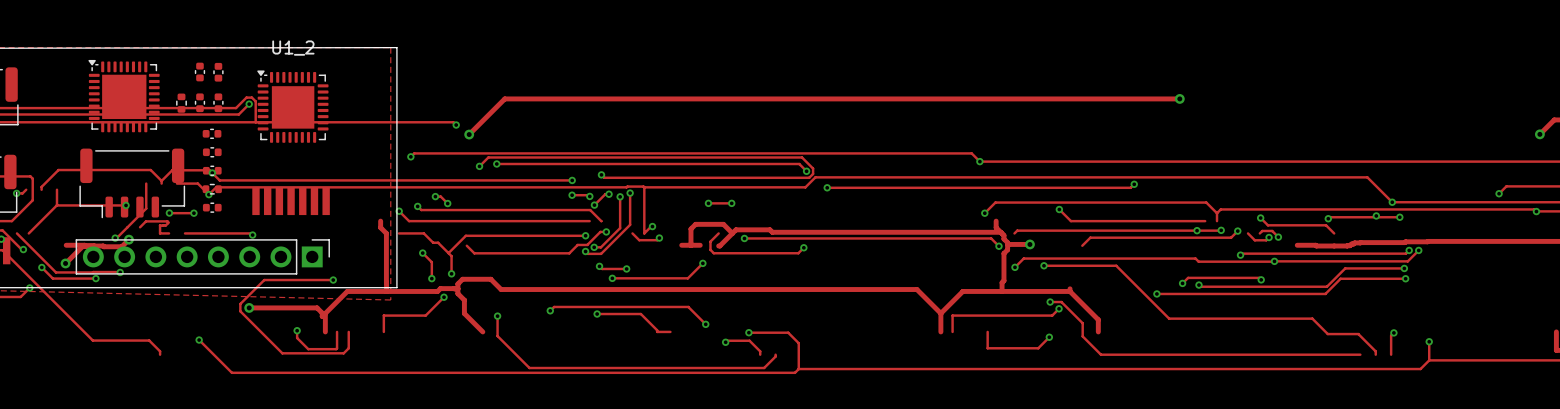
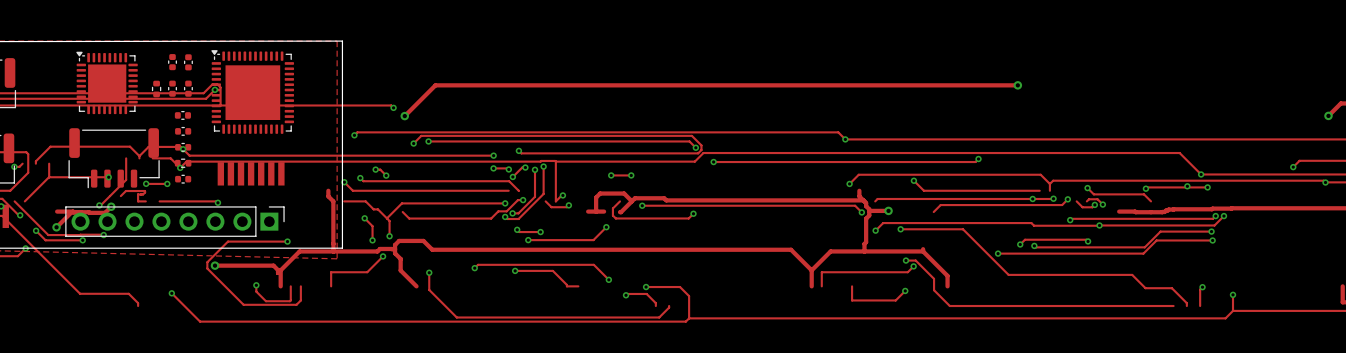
U1_2: (292, 106) -> none
part: none -> (252, 91)

